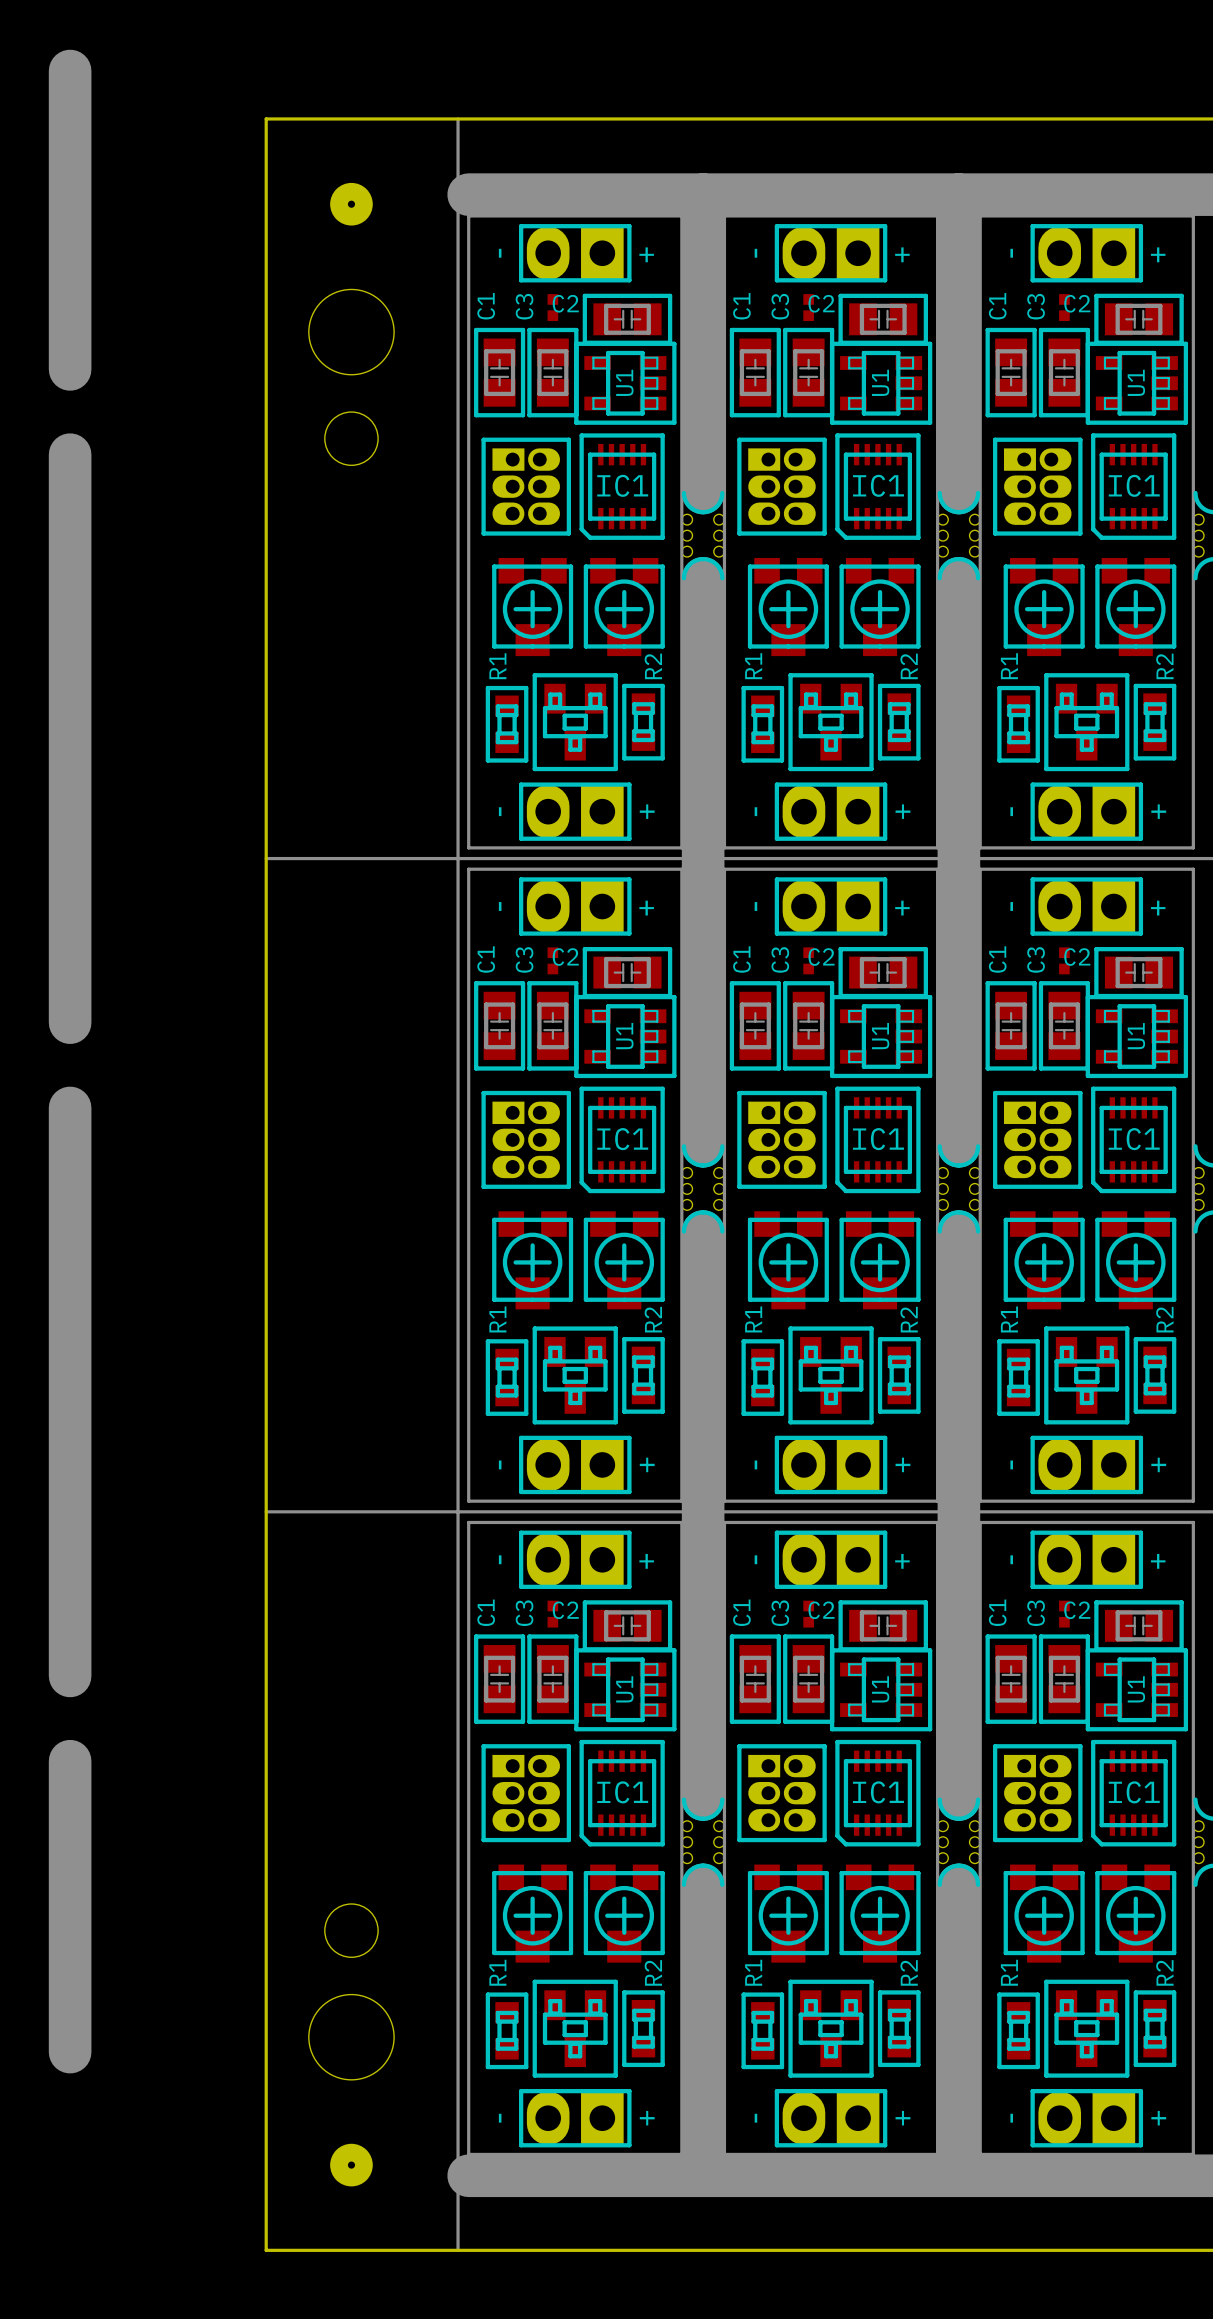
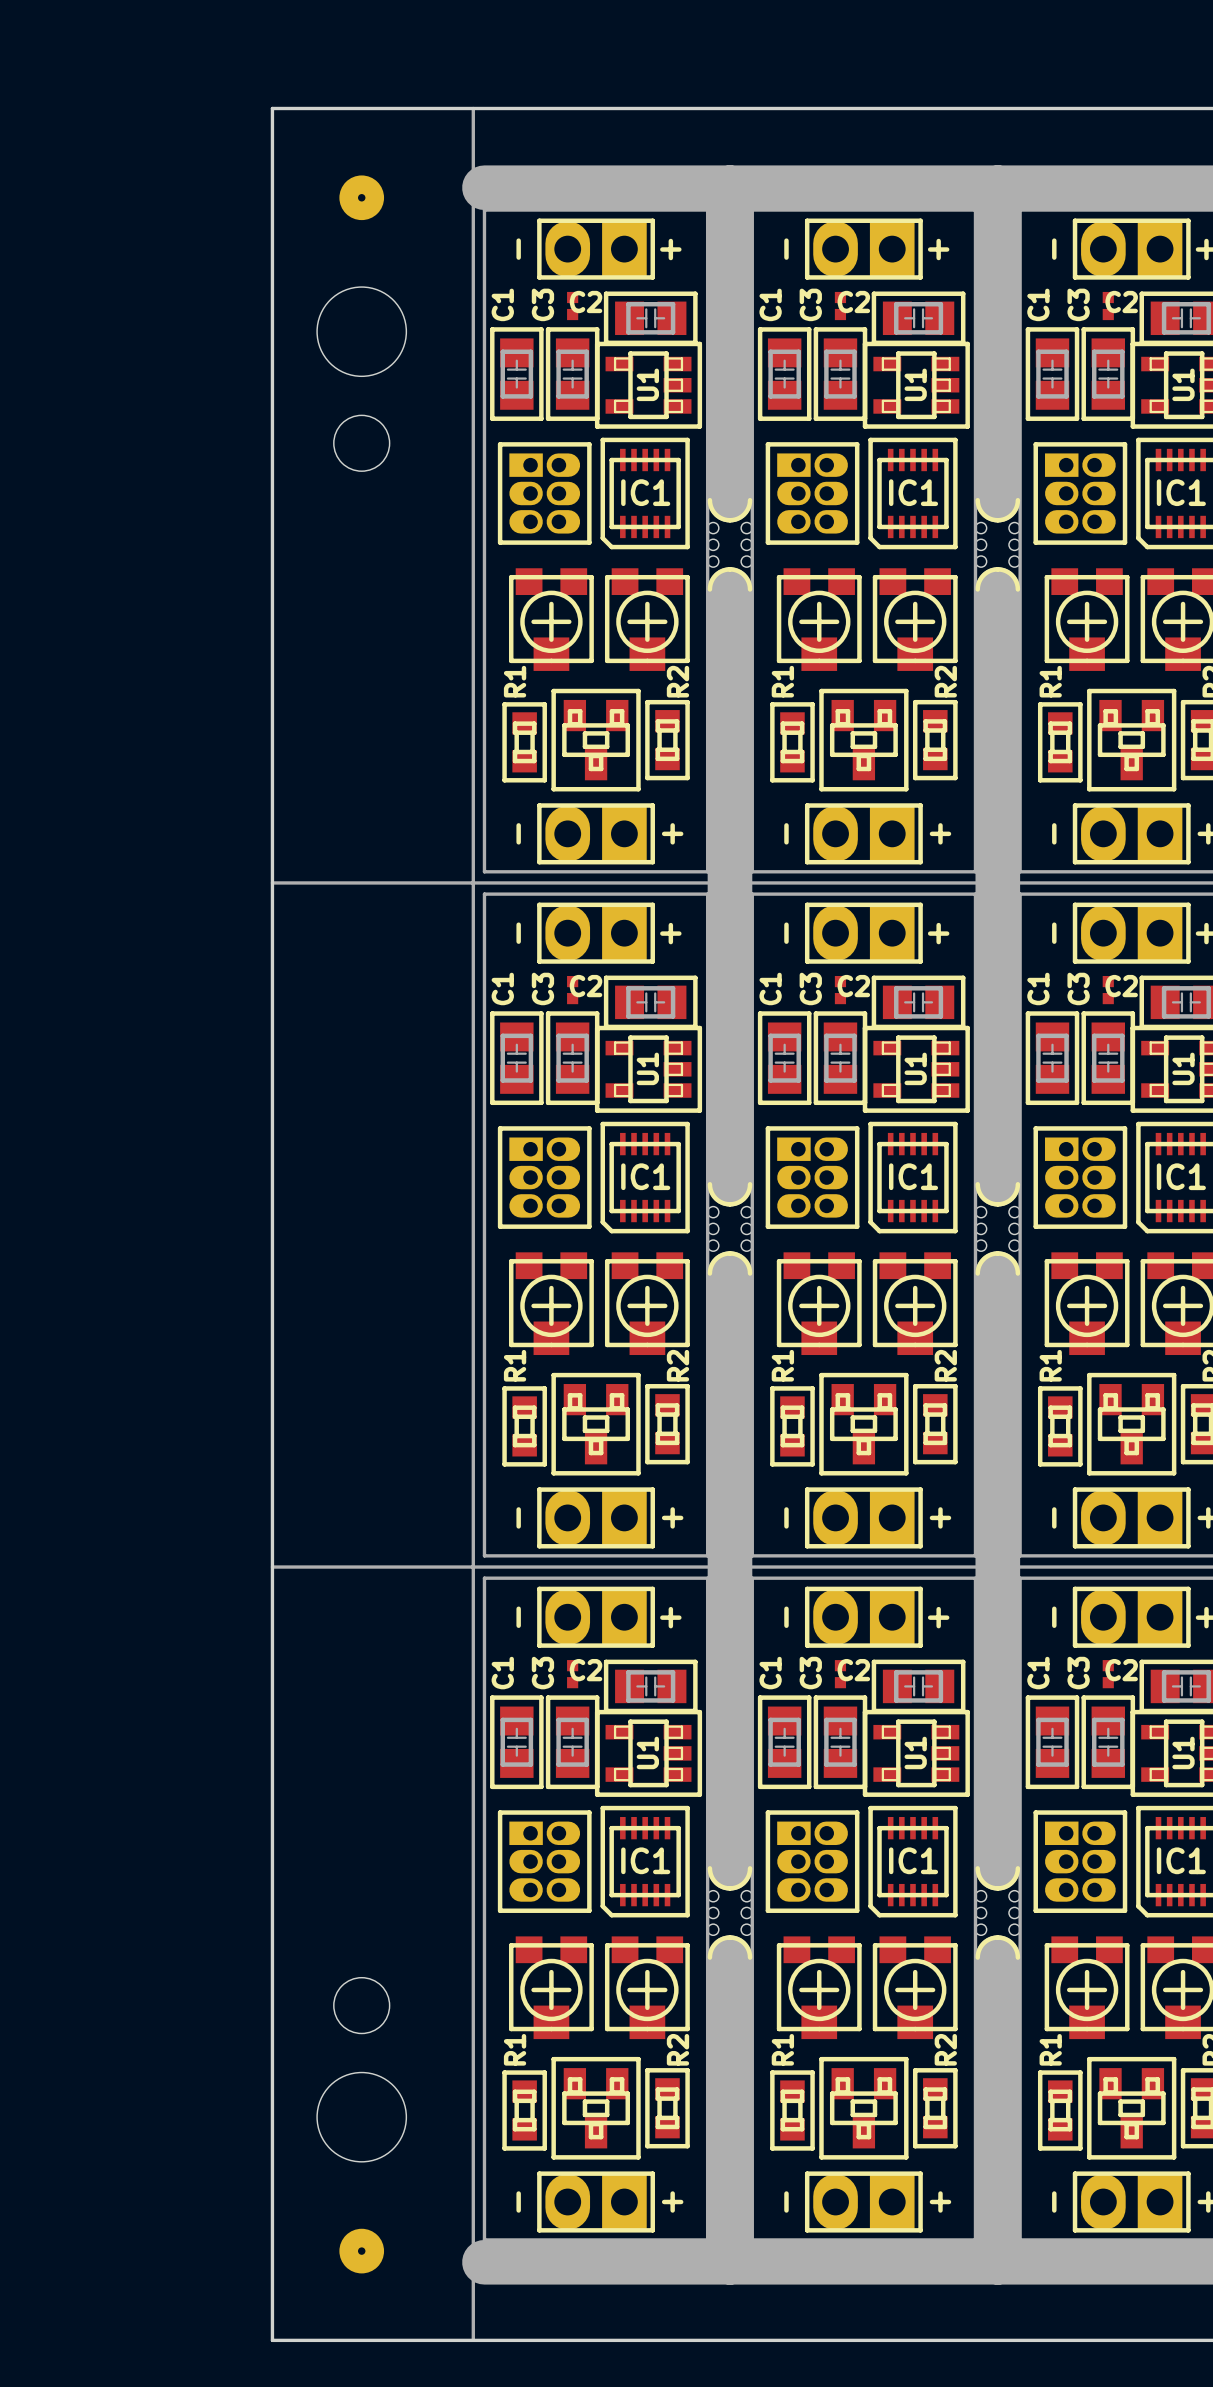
line: (70, 71) (70, 369) -> none
line: (70, 454) (70, 1022) -> none
line: (70, 1107) (70, 1675) -> none
line: (70, 1761) (70, 2052) -> none

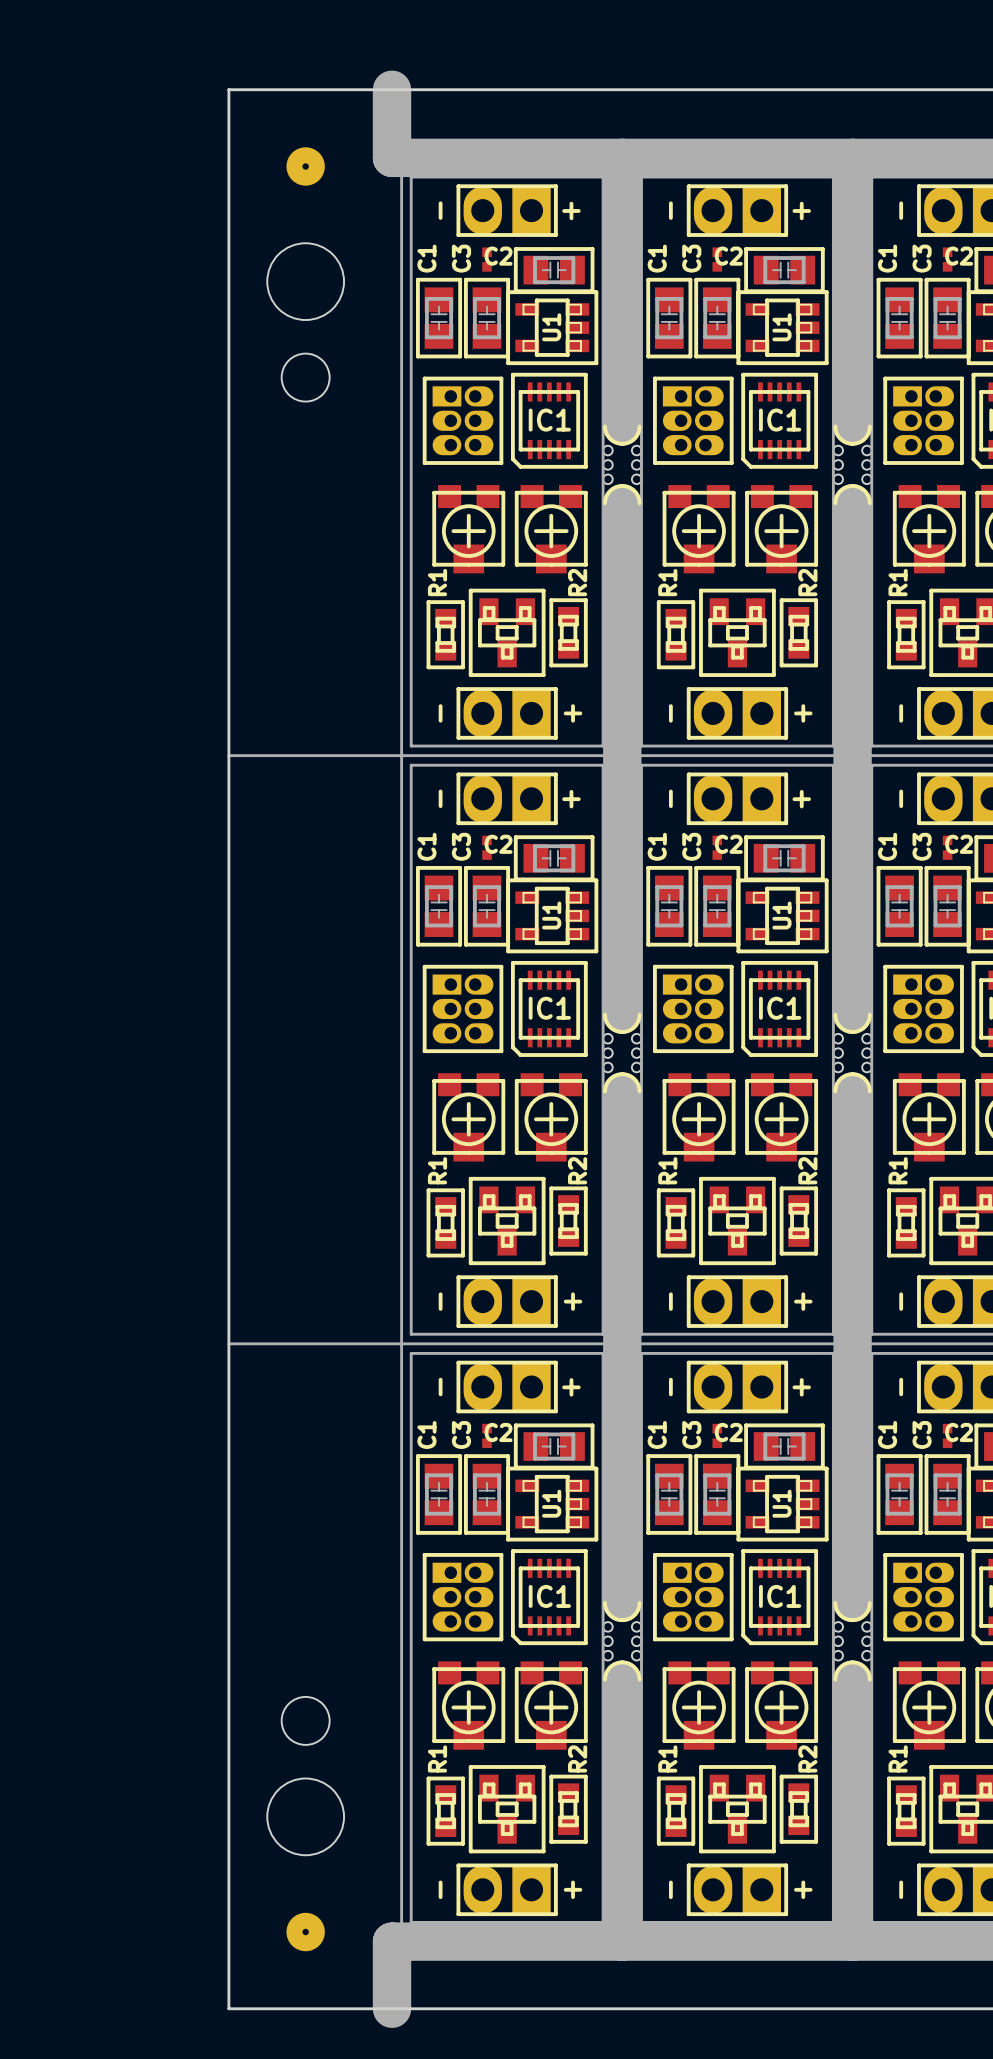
line: none -> (392, 89) (392, 157) (411, 157)
line: none -> (411, 1941) (392, 1941) (392, 2008)

